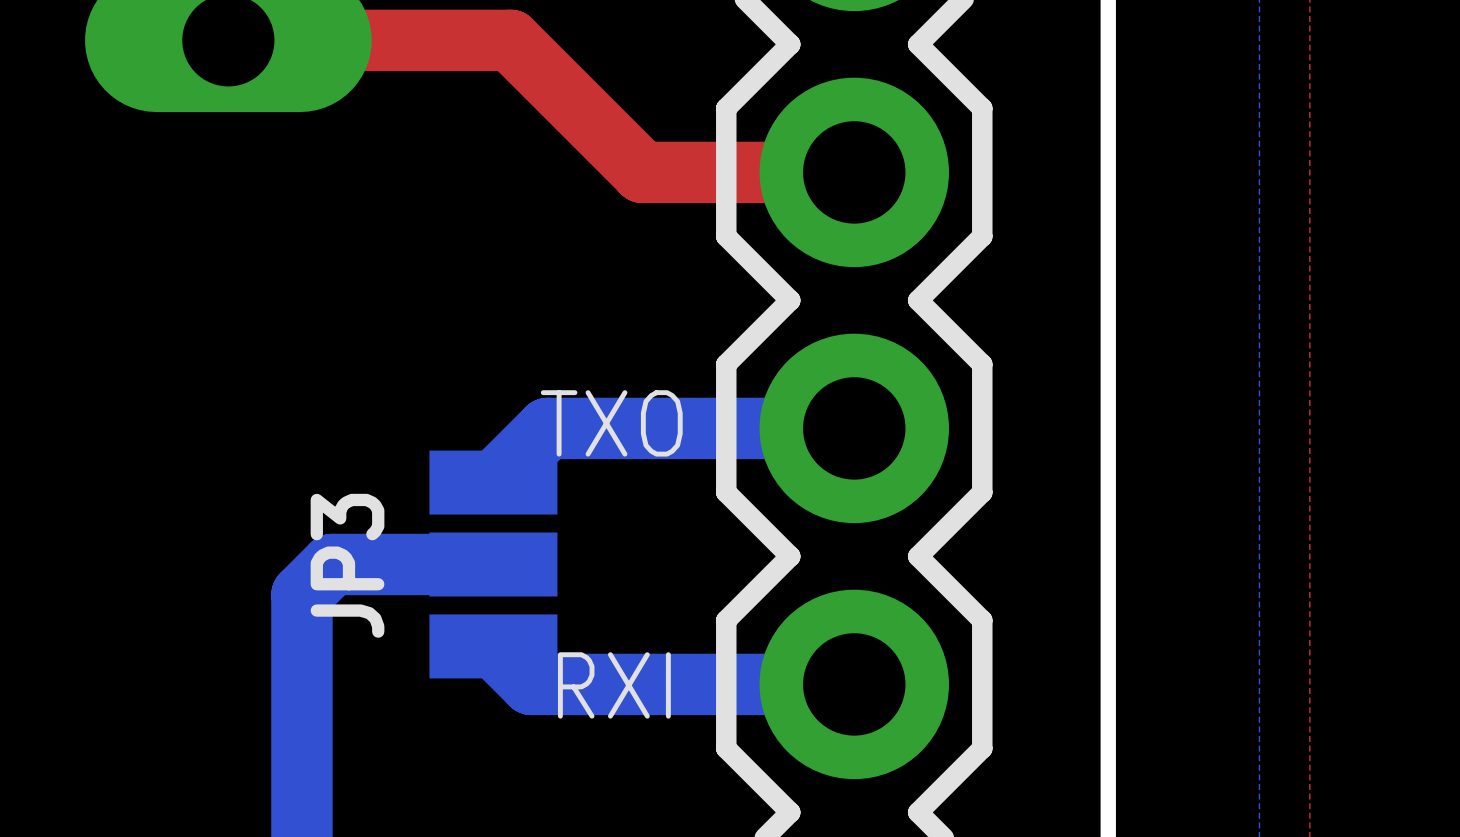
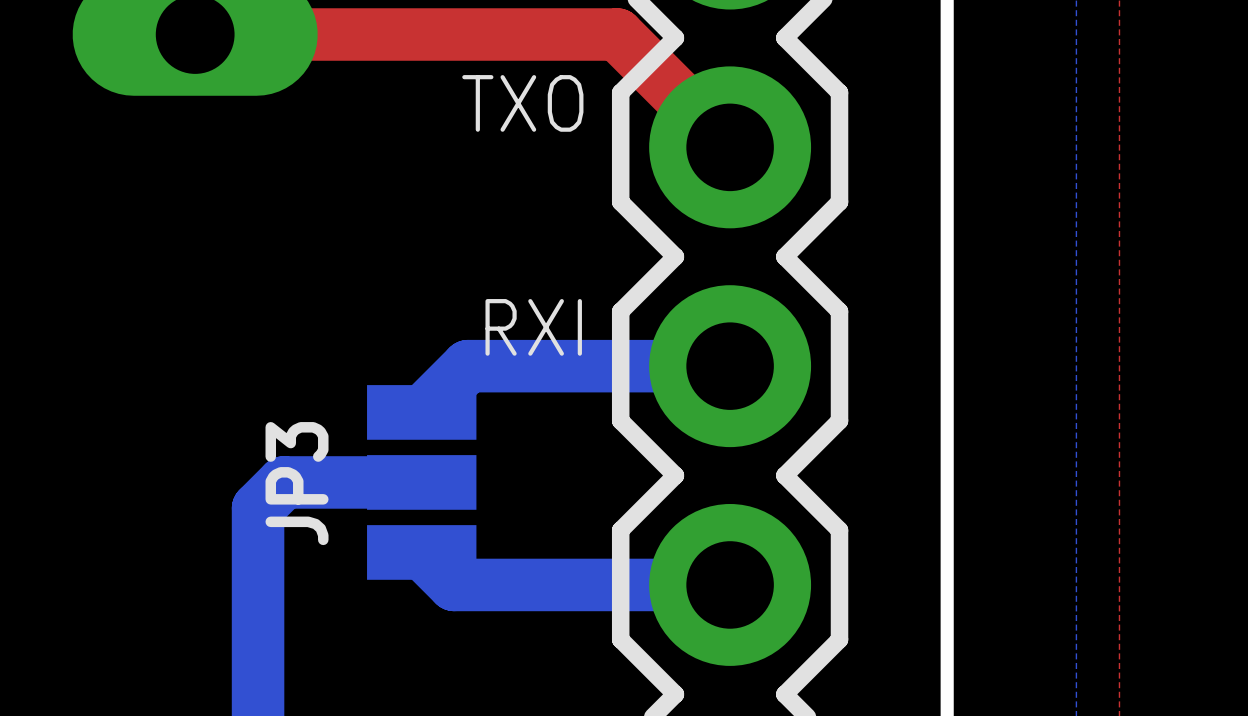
top track: (510, 40) (642, 172) (854, 172) -> (436, 34) (617, 34) (730, 147)
text position: TXO (611, 423) -> TXO (522, 103)
text position: RXI (614, 685) -> RXI (533, 327)

